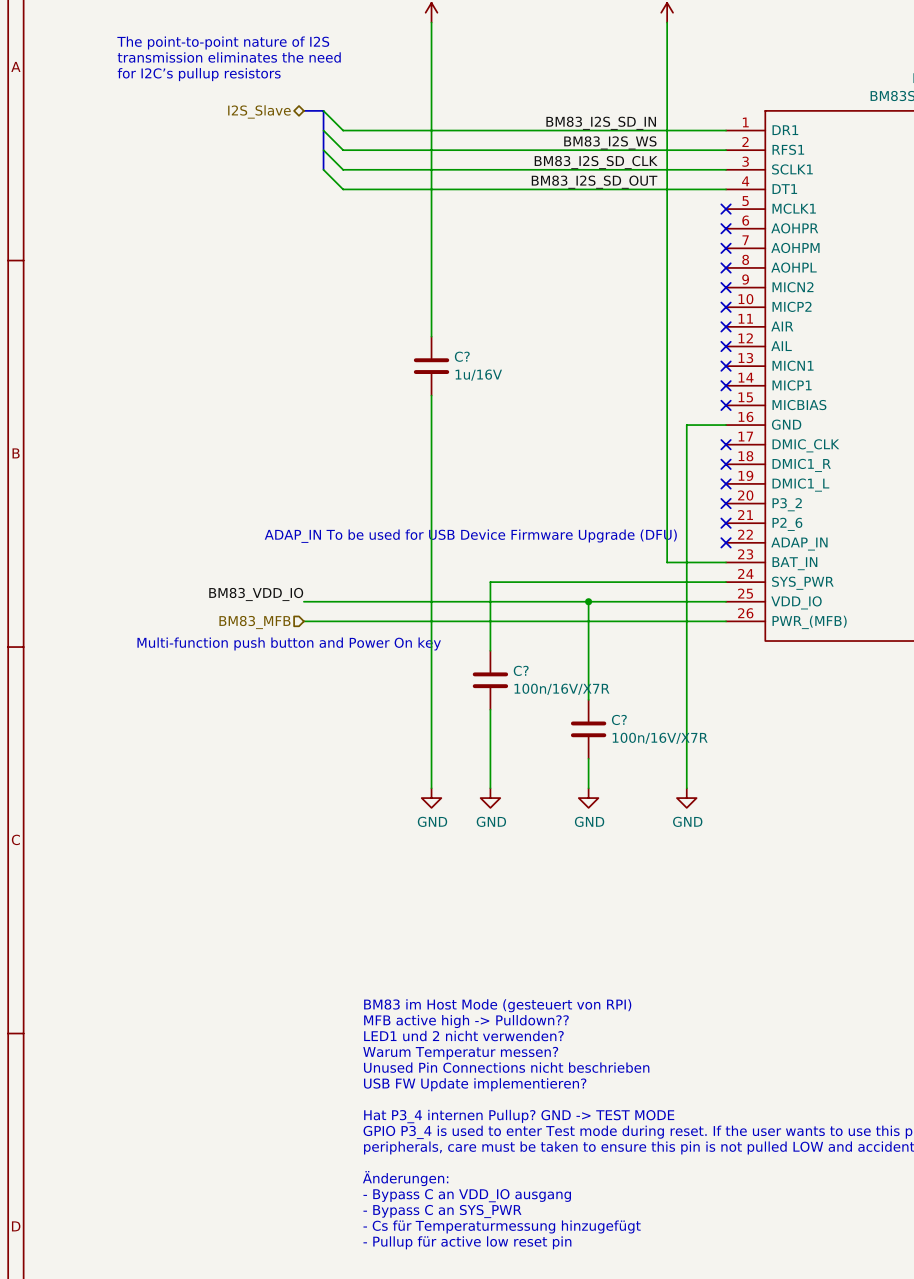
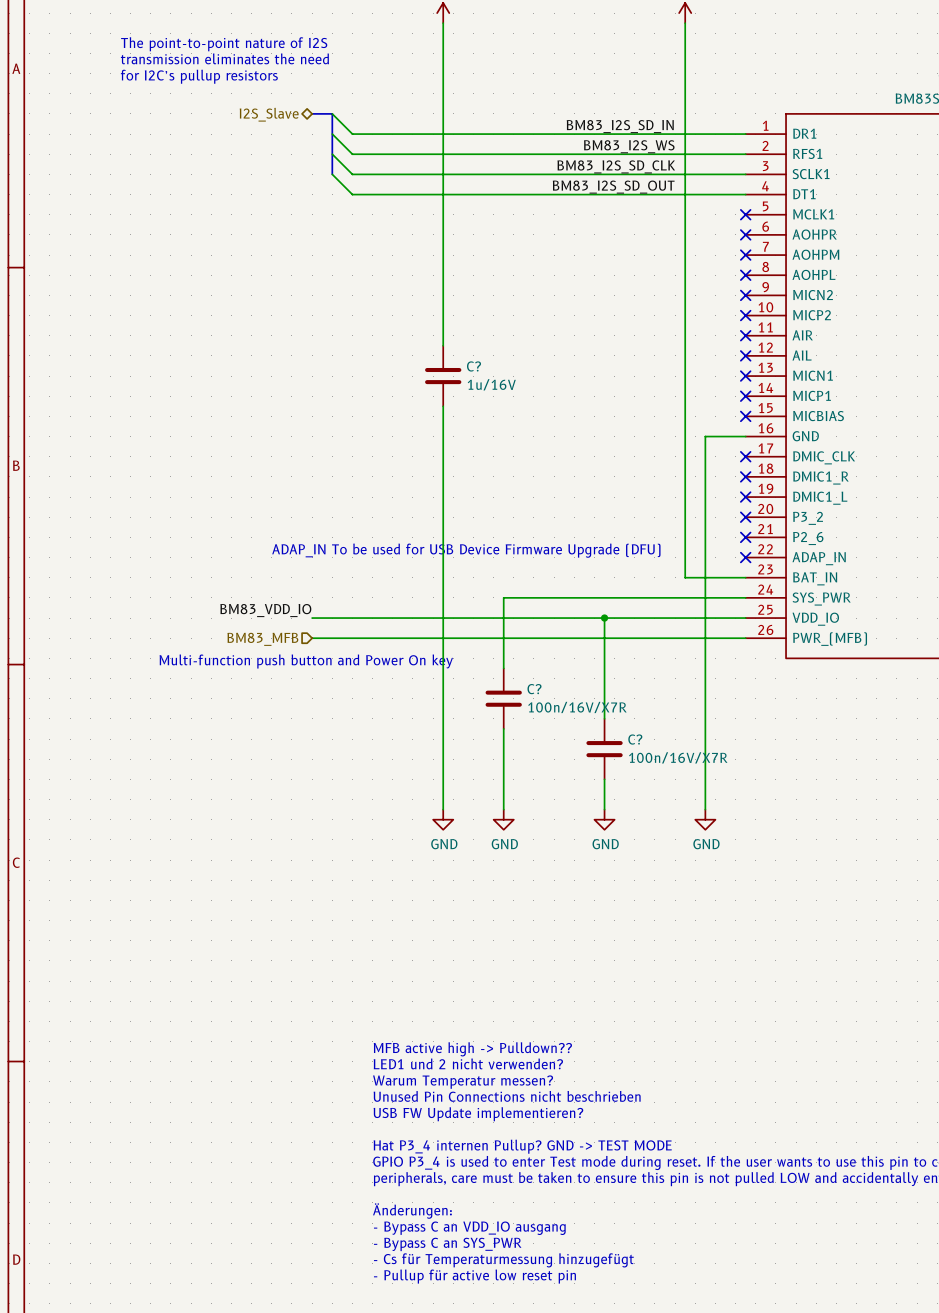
text: BM83 im Host Mode (gesteuert von RPI) (497, 1005) -> none

